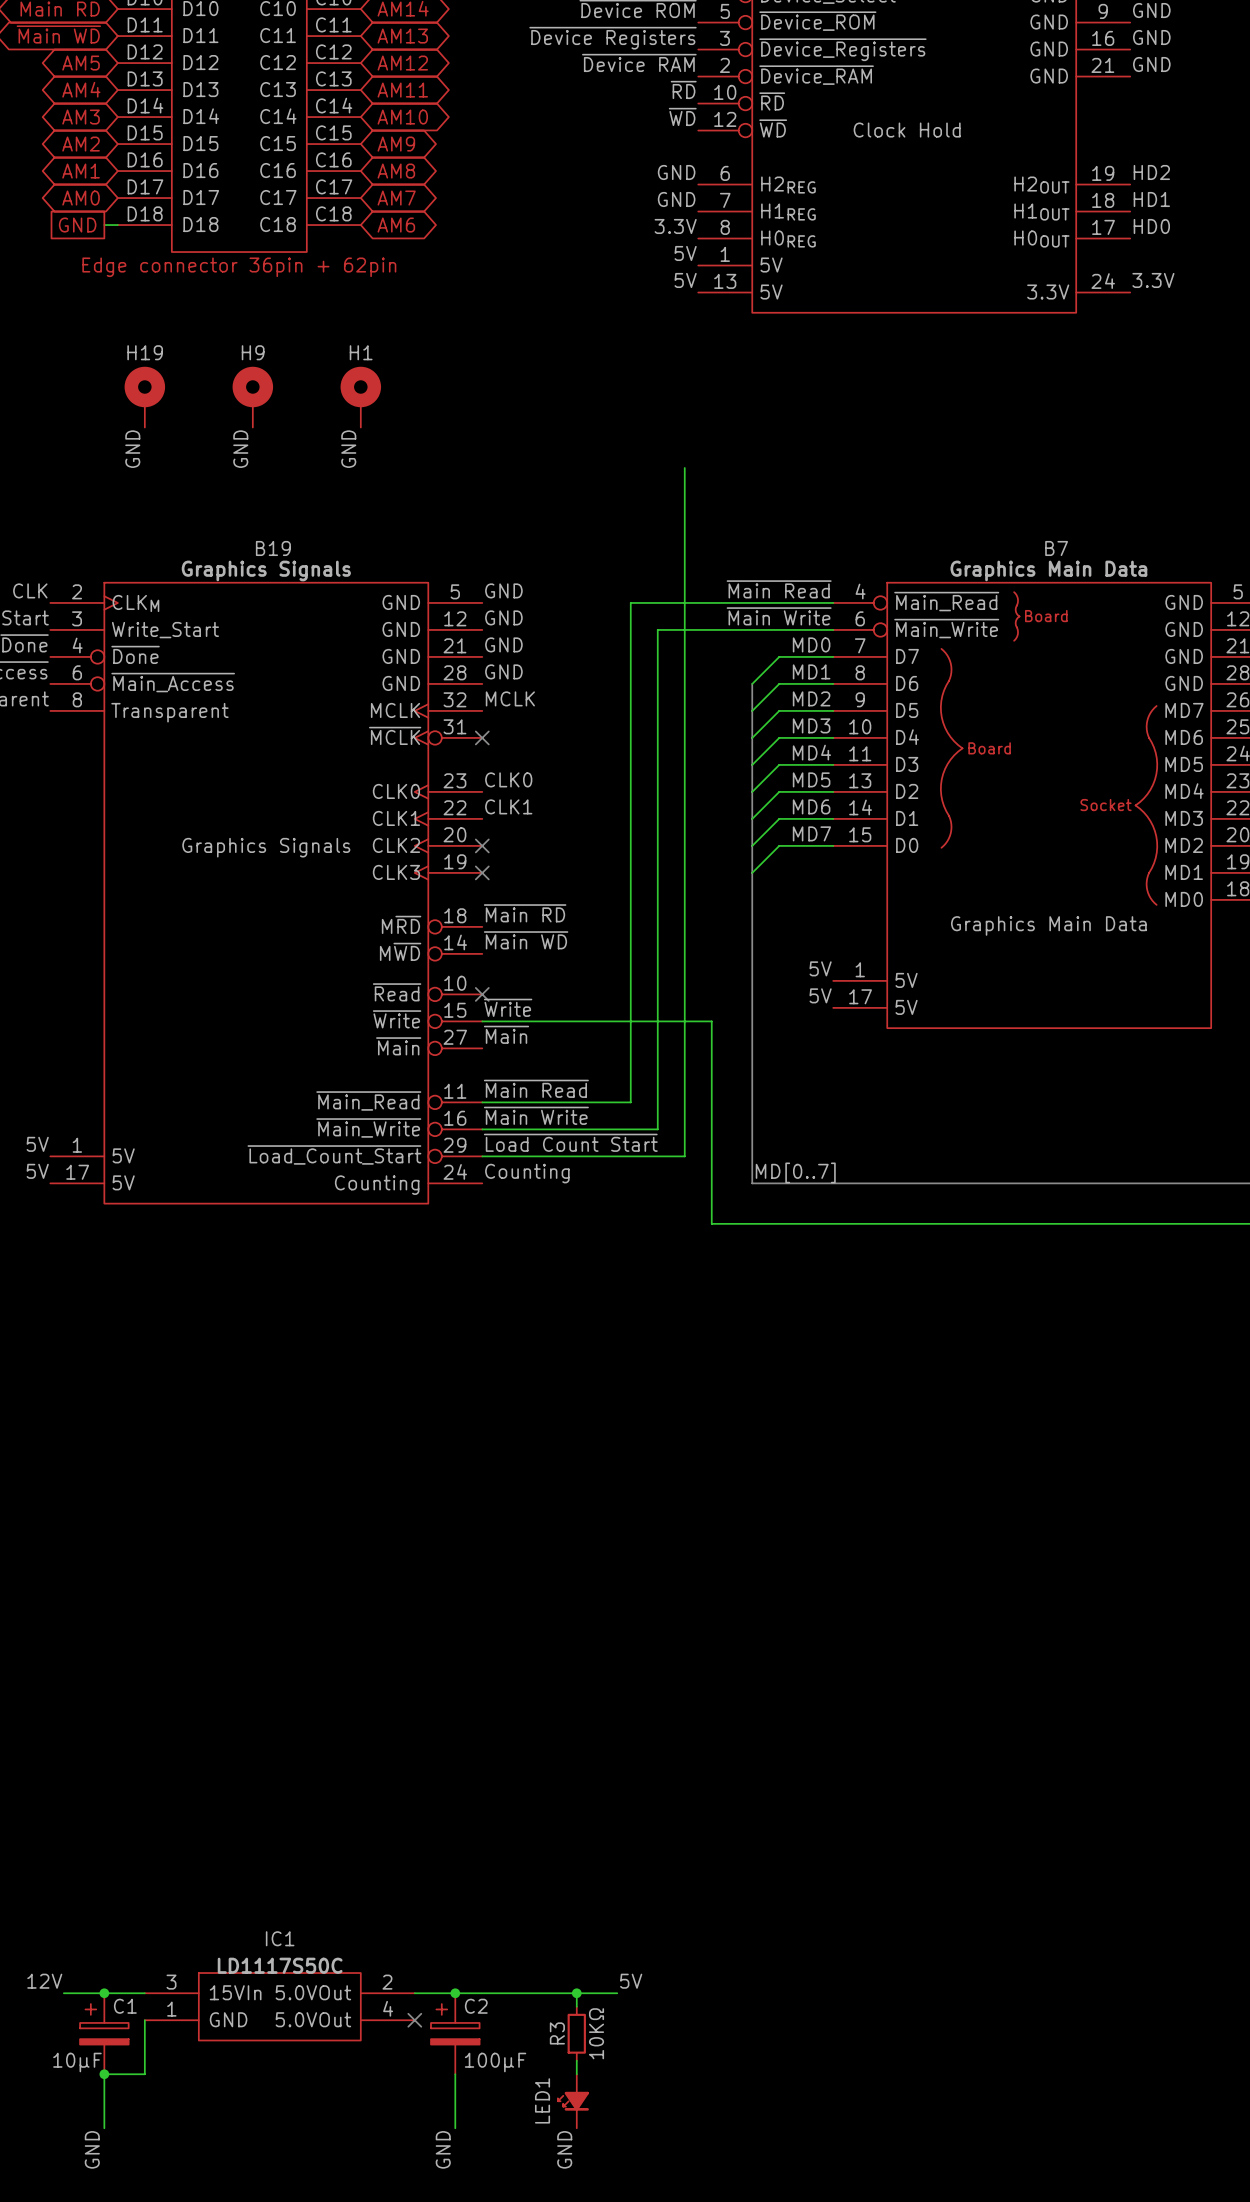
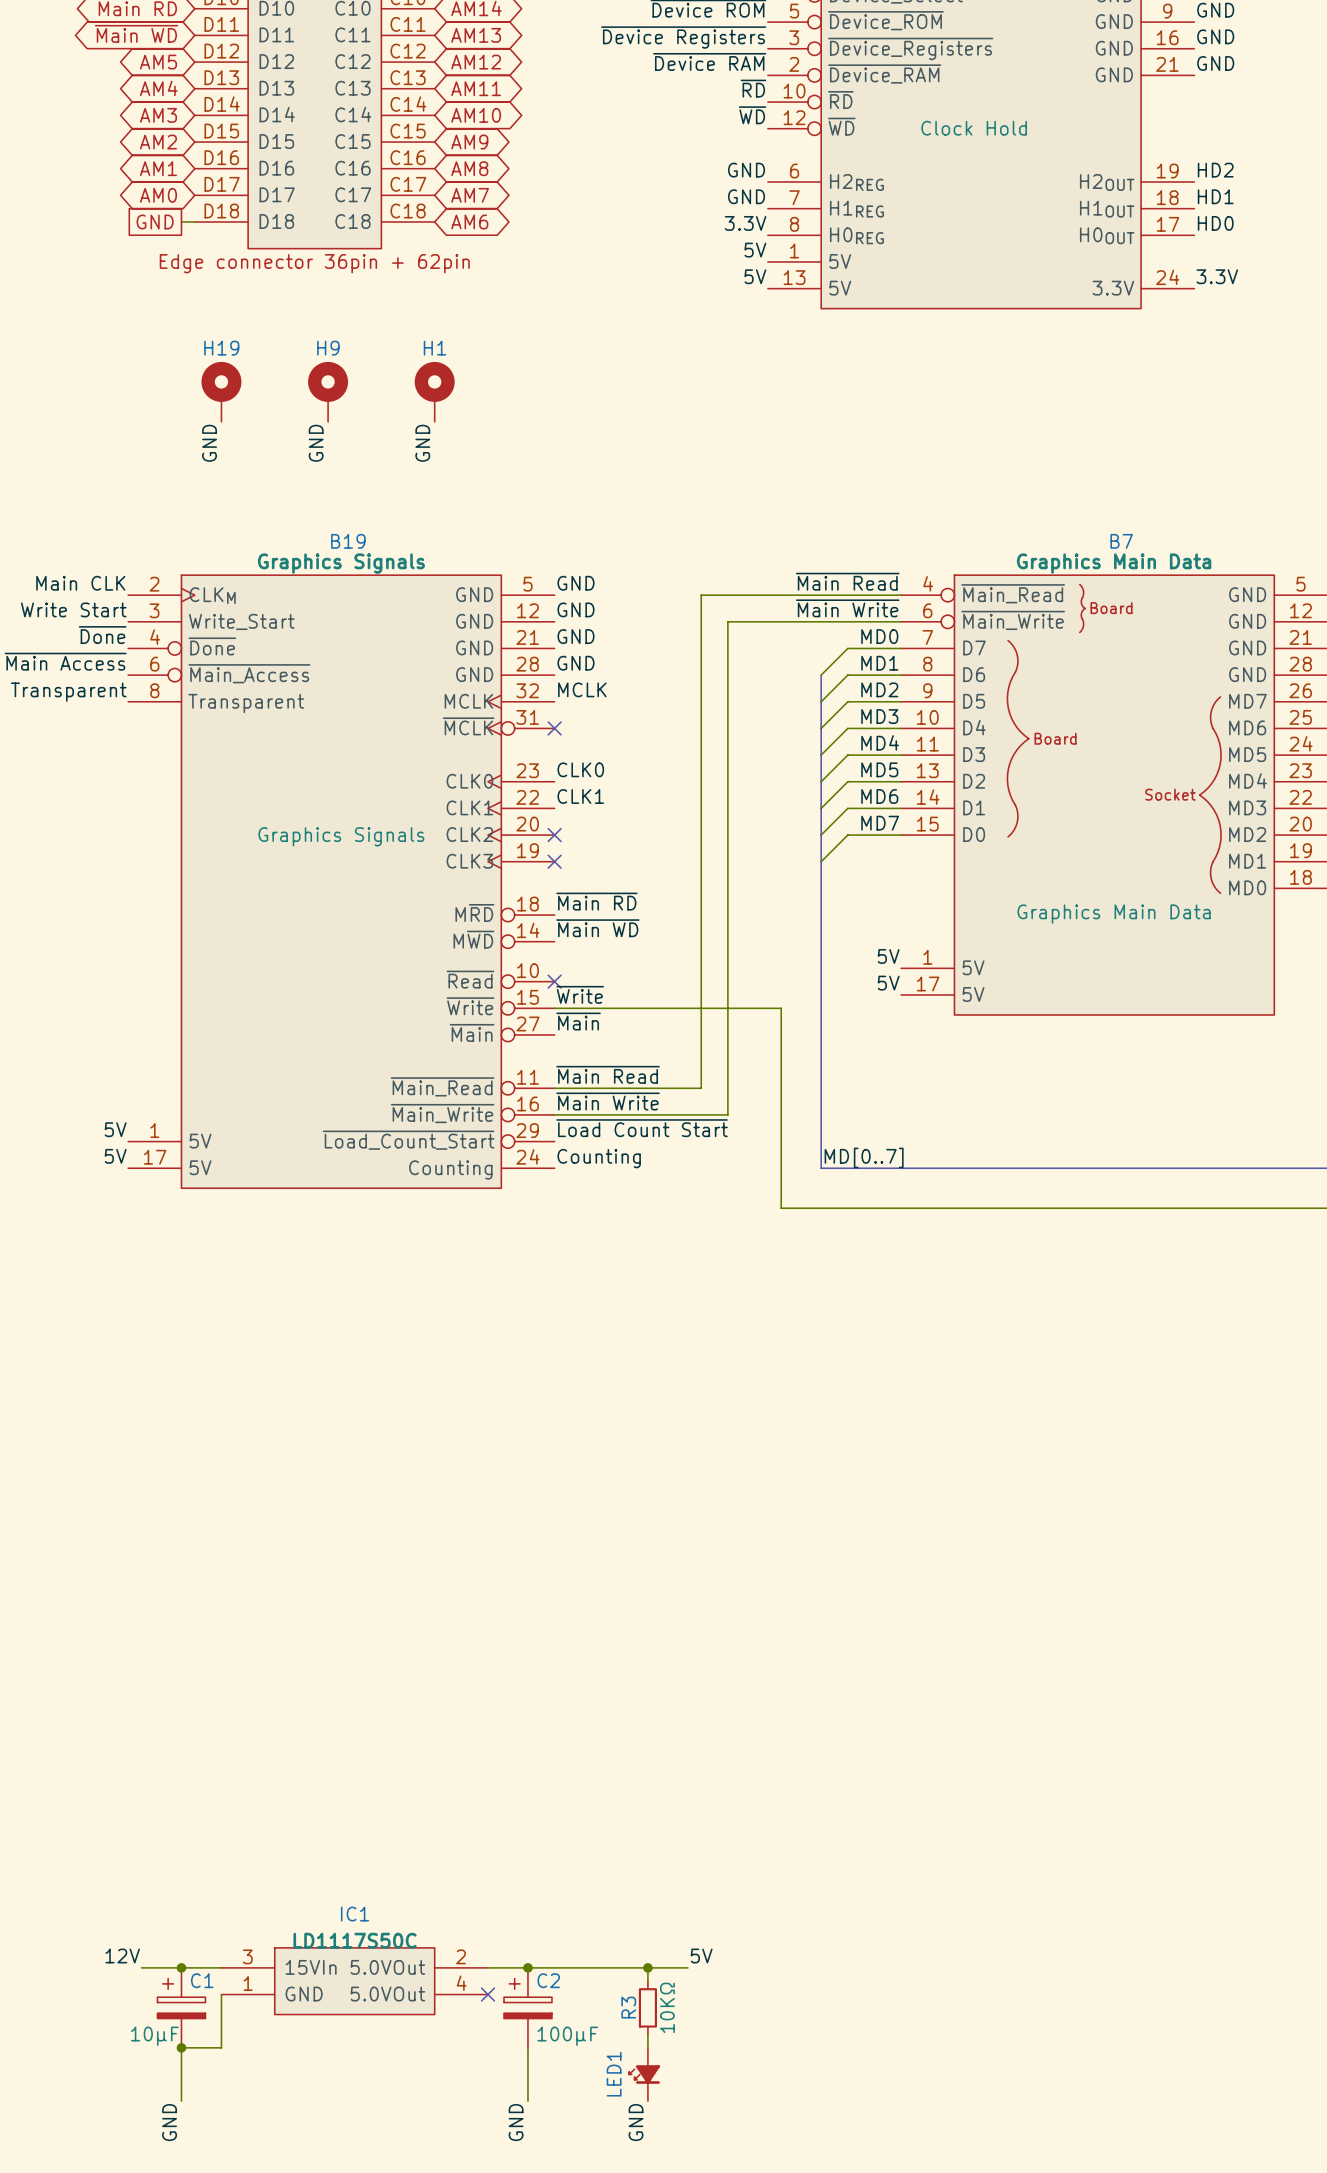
wire: (684, 467) (684, 1156) (482, 1156) -> none

